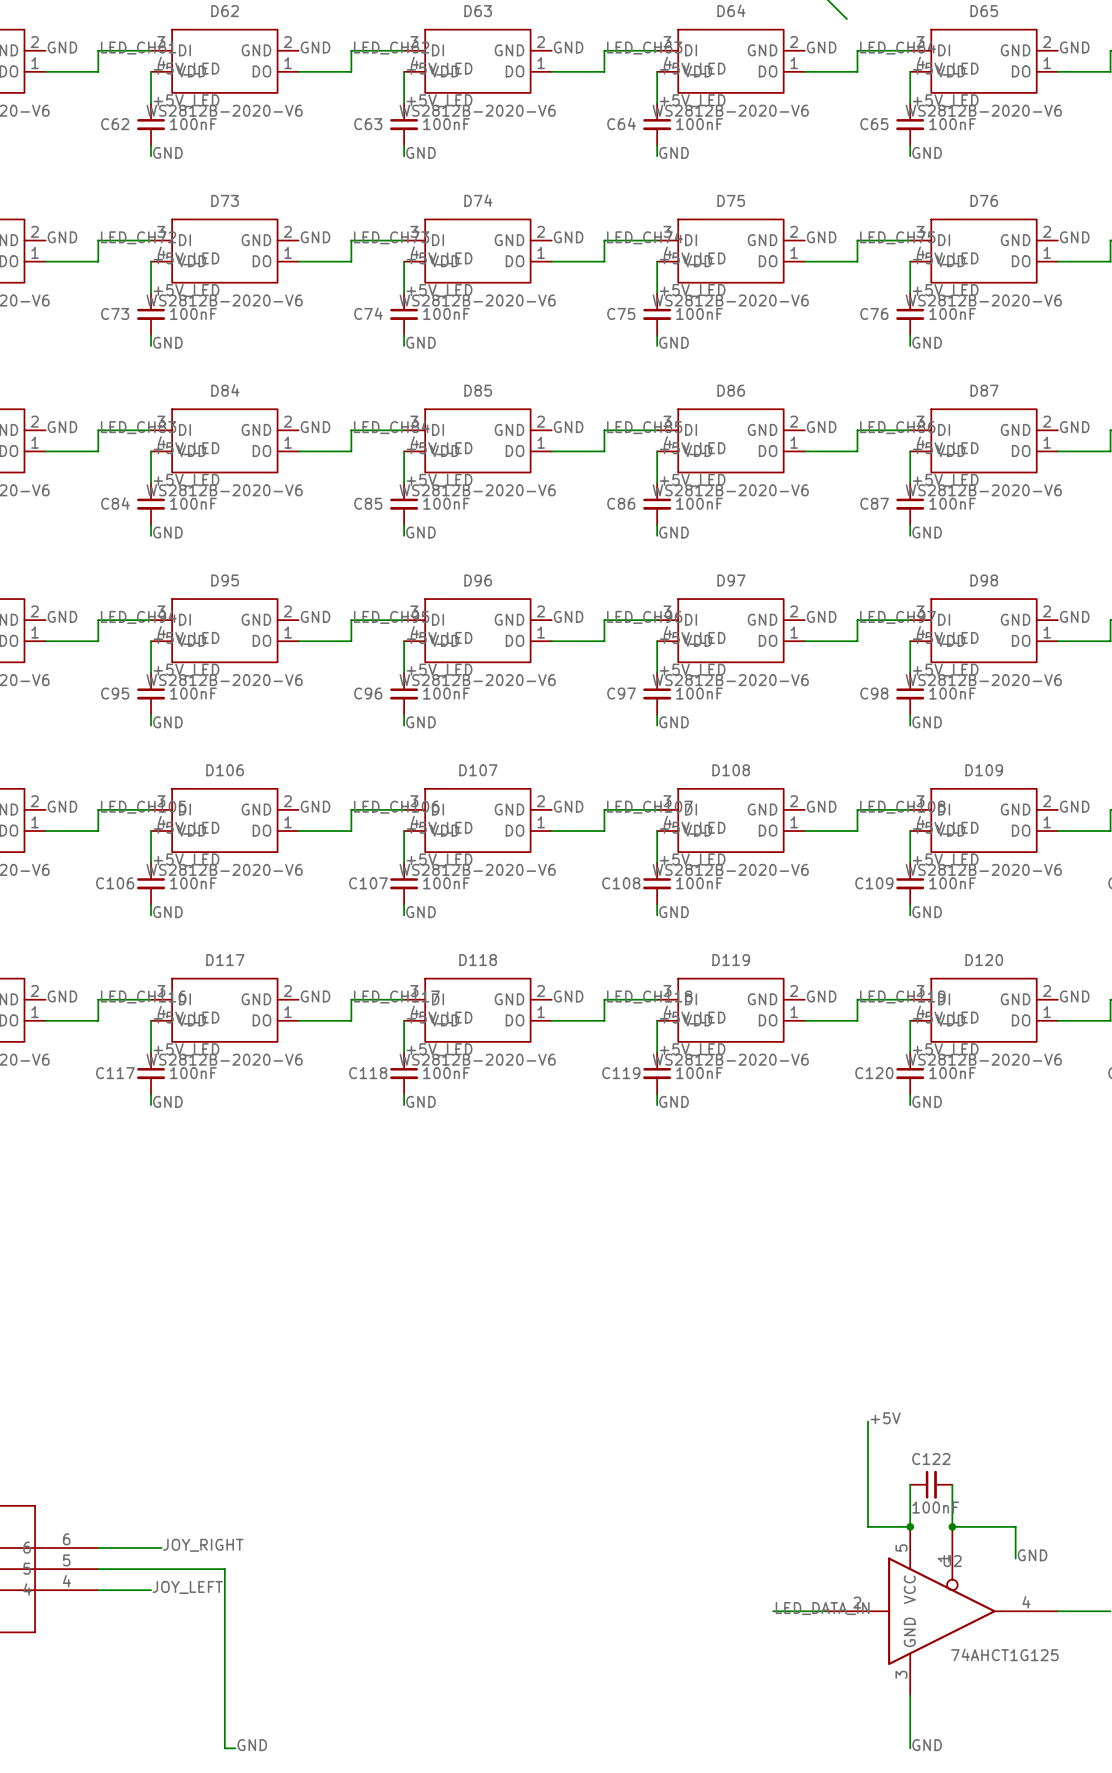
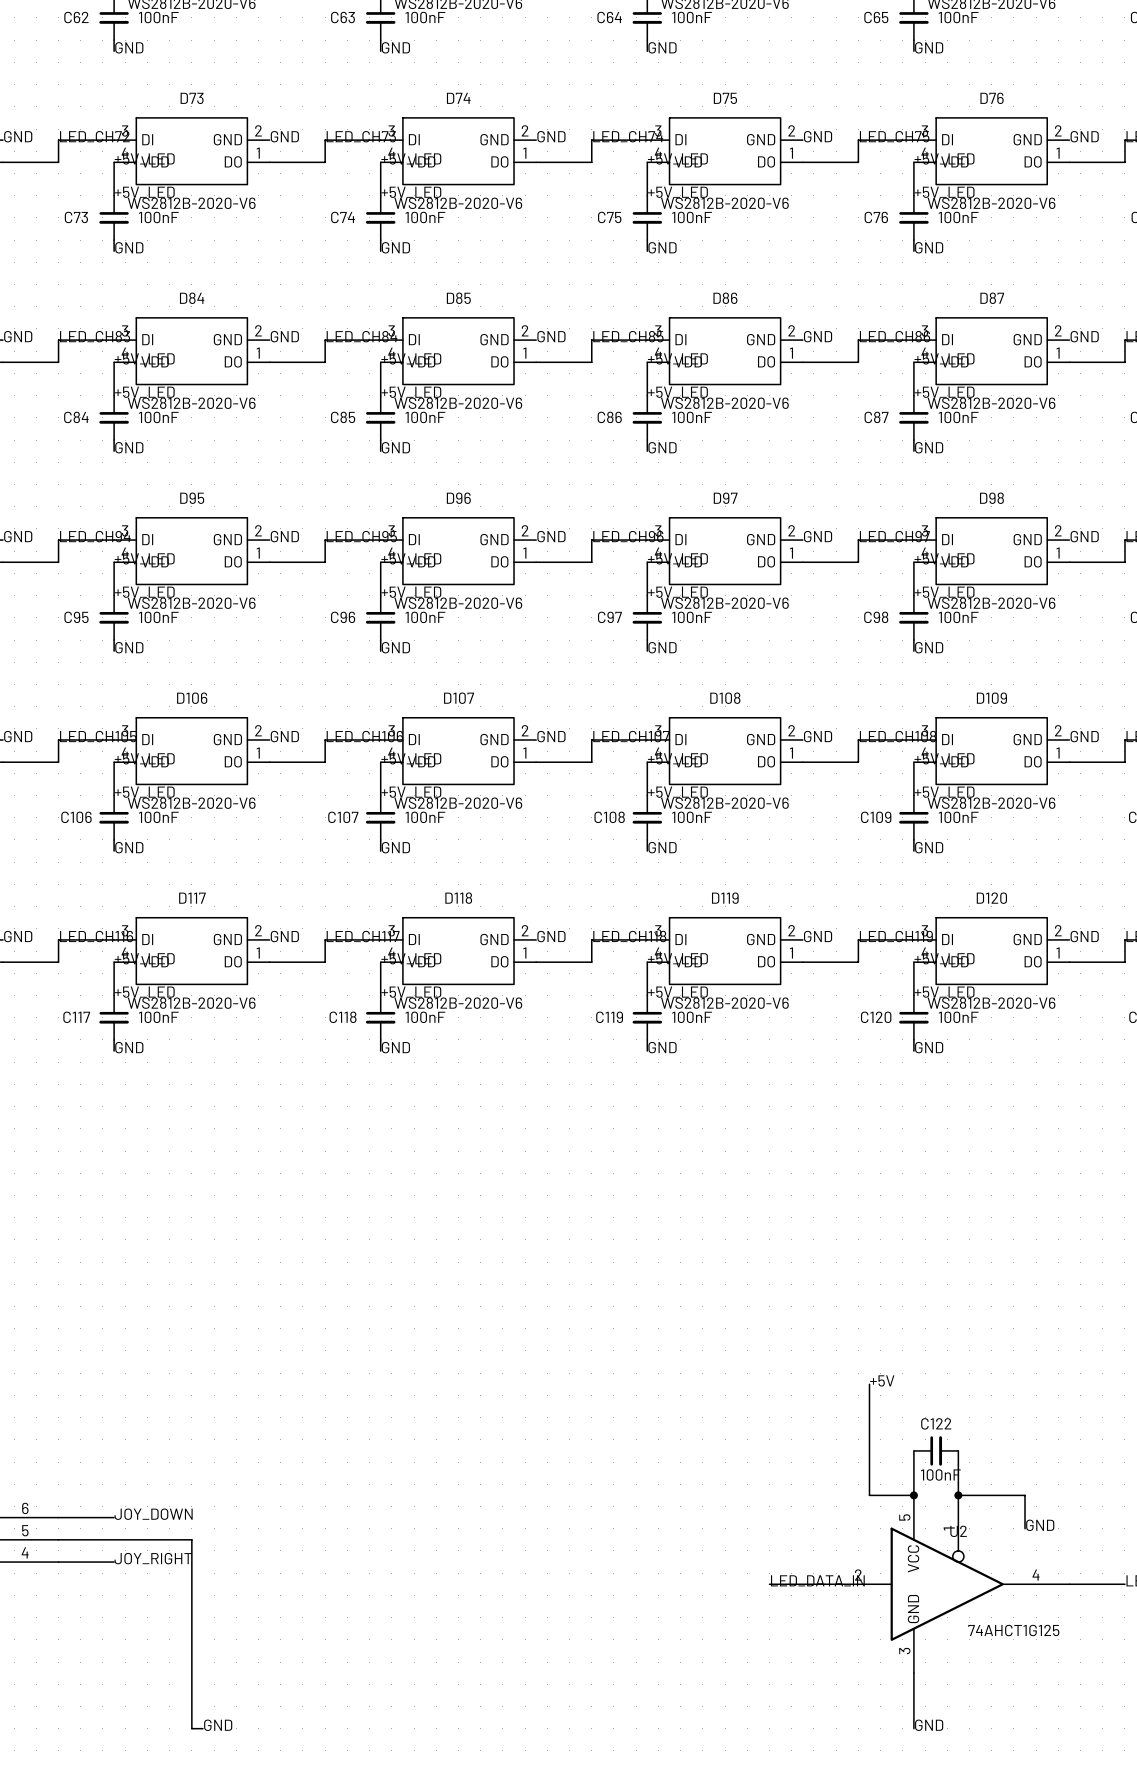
label: none -> JOY_DOWN (153, 1514)
label: JOY_RIGHT (203, 1545) -> none
wire: (151, 1548) (161, 1548) -> none
label: JOY_LEFT (187, 1587) -> JOY_RIGHT (153, 1558)

